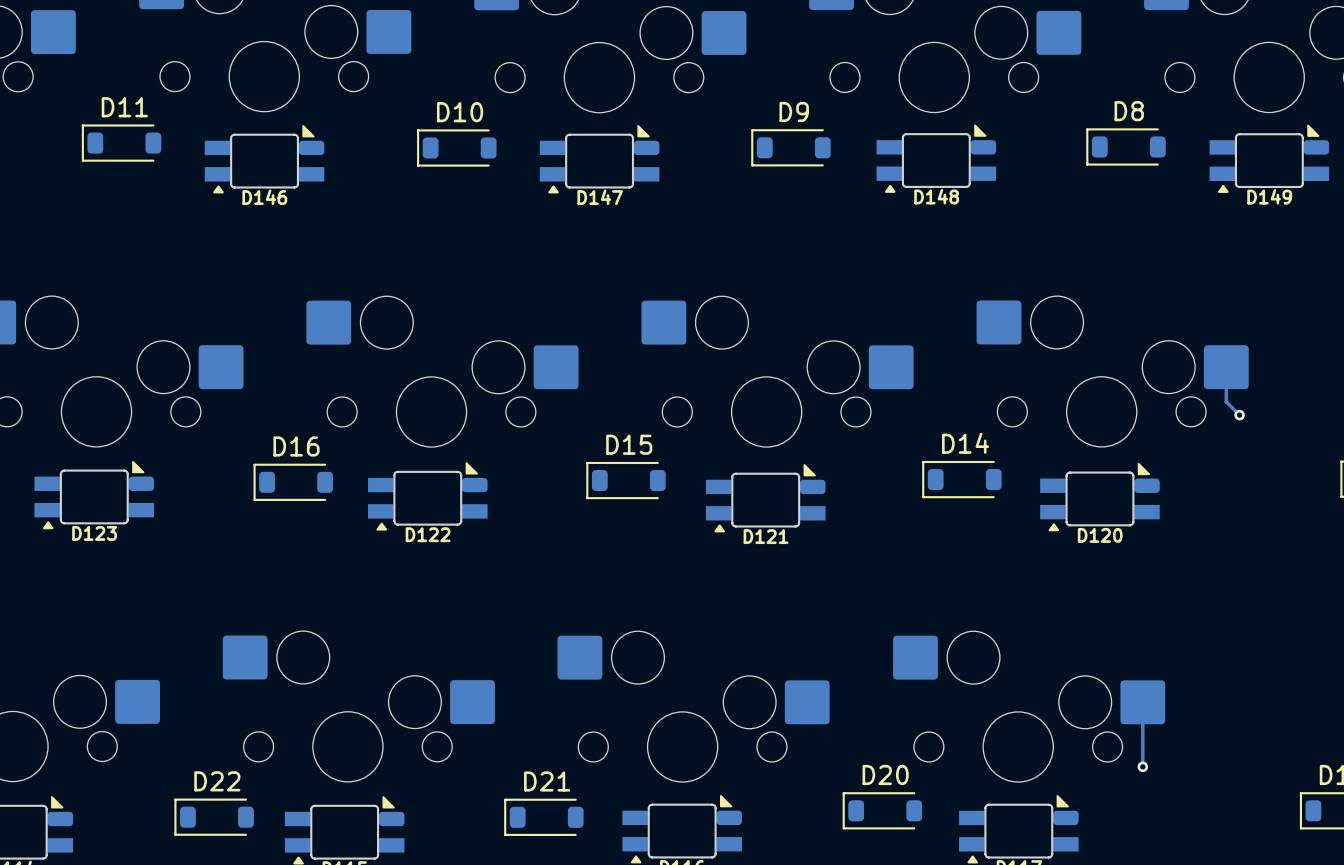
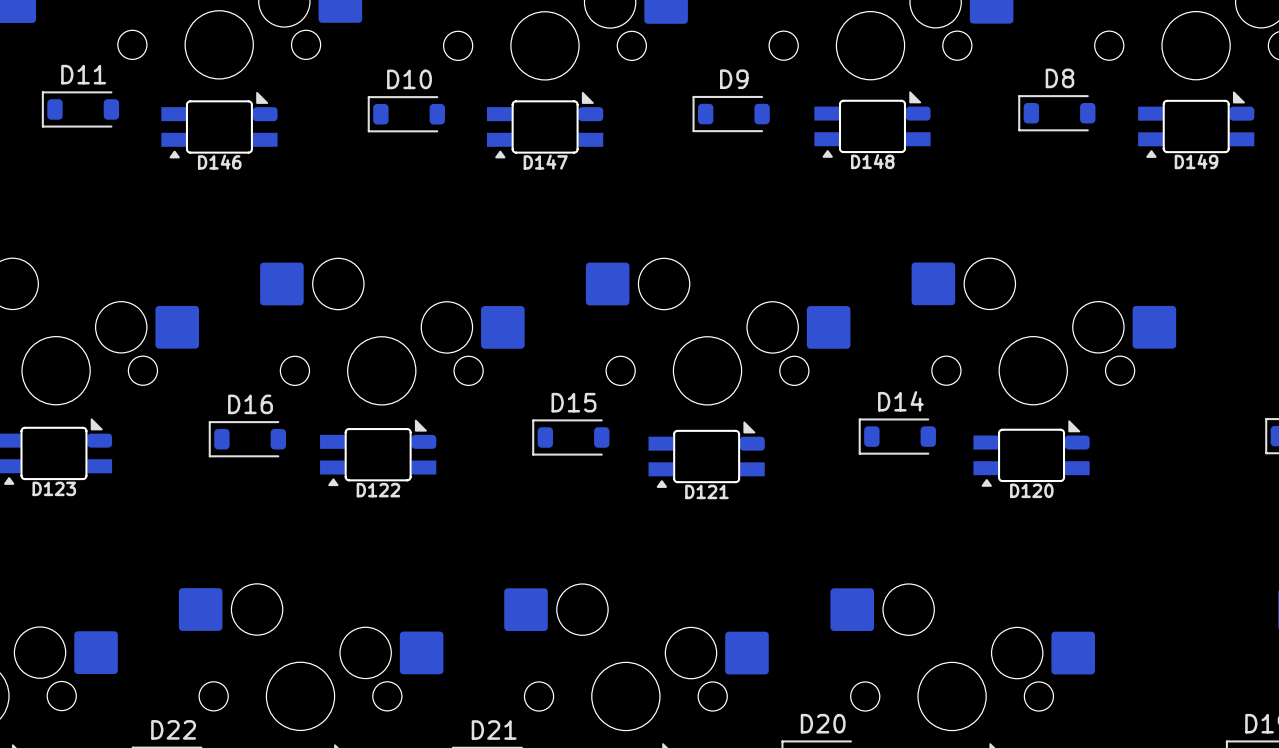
track: (1226, 367) (1226, 401) (1239, 415) -> none
via: (1239, 415) -> none
track: (1142, 702) (1142, 766) -> none
via: (1142, 766) -> none

